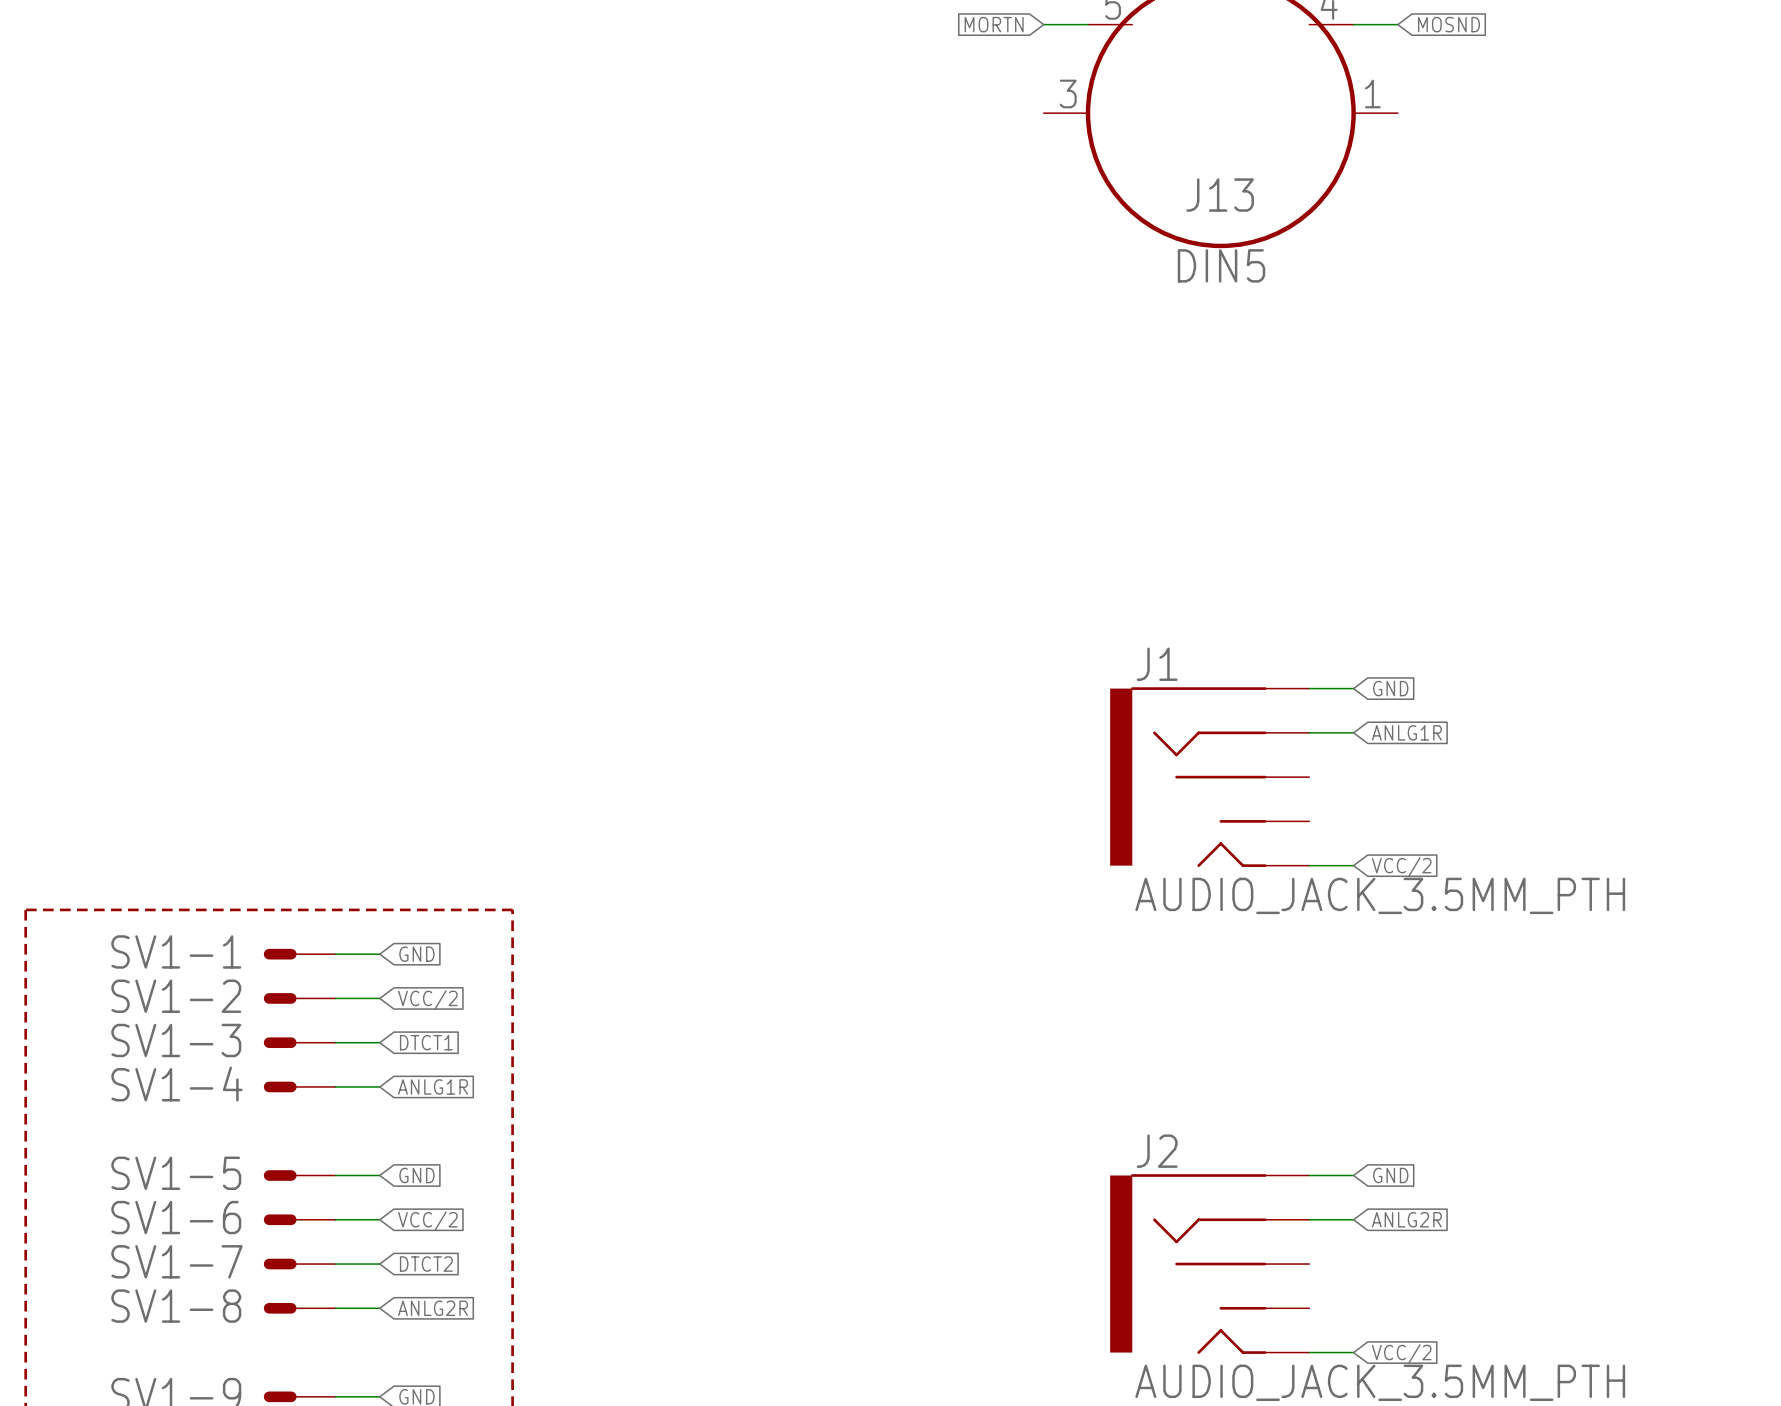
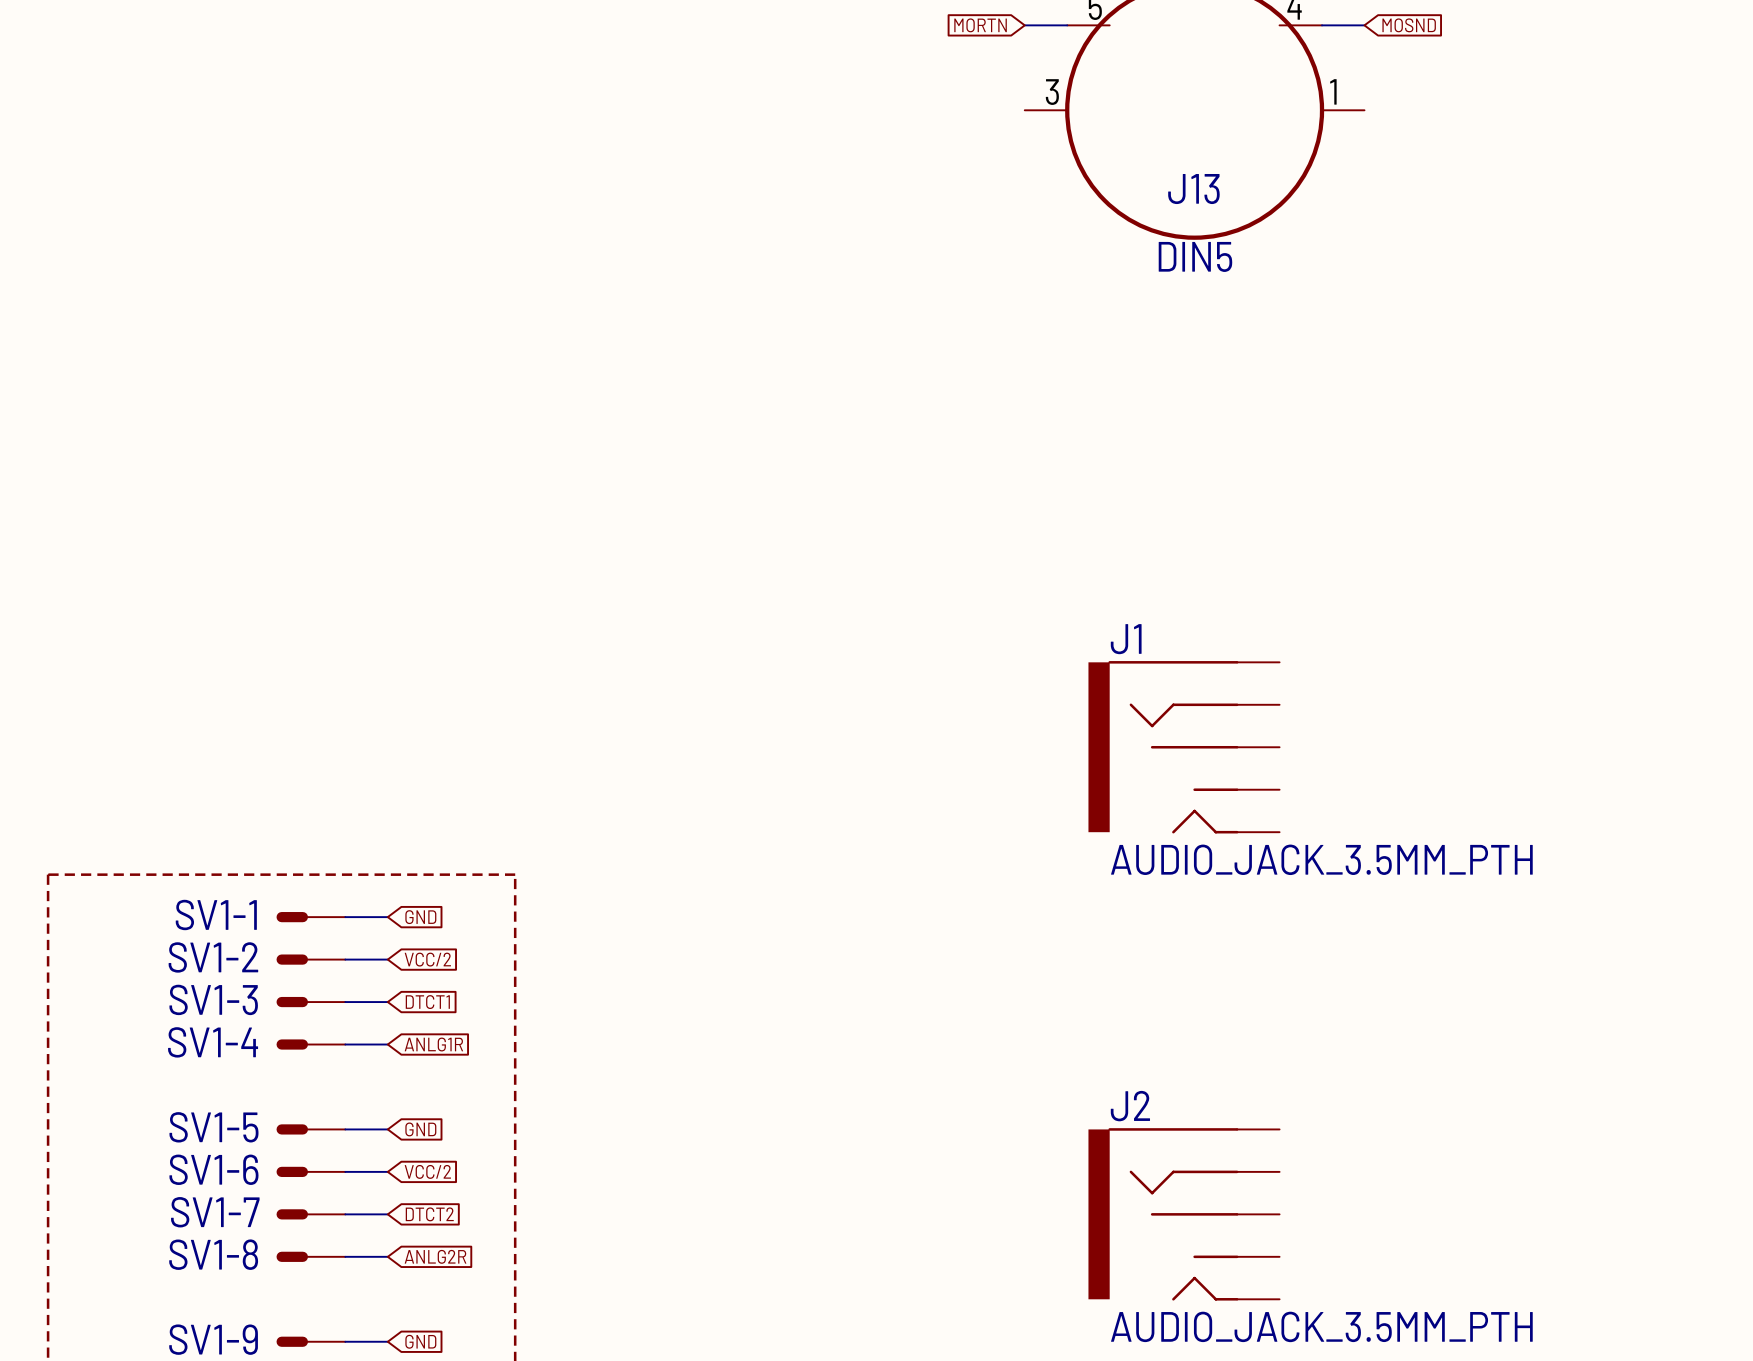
wire: (1309, 688) (1353, 688) -> none
global label: GND (1390, 688) -> none
wire: (1309, 732) (1353, 732) -> none
global label: ANLG1R (1406, 732) -> none
wire: (1309, 865) (1353, 865) -> none
global label: VCC/2 (1401, 867) -> none
wire: (1309, 1175) (1353, 1175) -> none
global label: GND (1390, 1175) -> none
wire: (1309, 1219) (1353, 1219) -> none
global label: ANLG2R (1406, 1219) -> none
wire: (1309, 1352) (1353, 1352) -> none
global label: VCC/2 (1401, 1353) -> none

